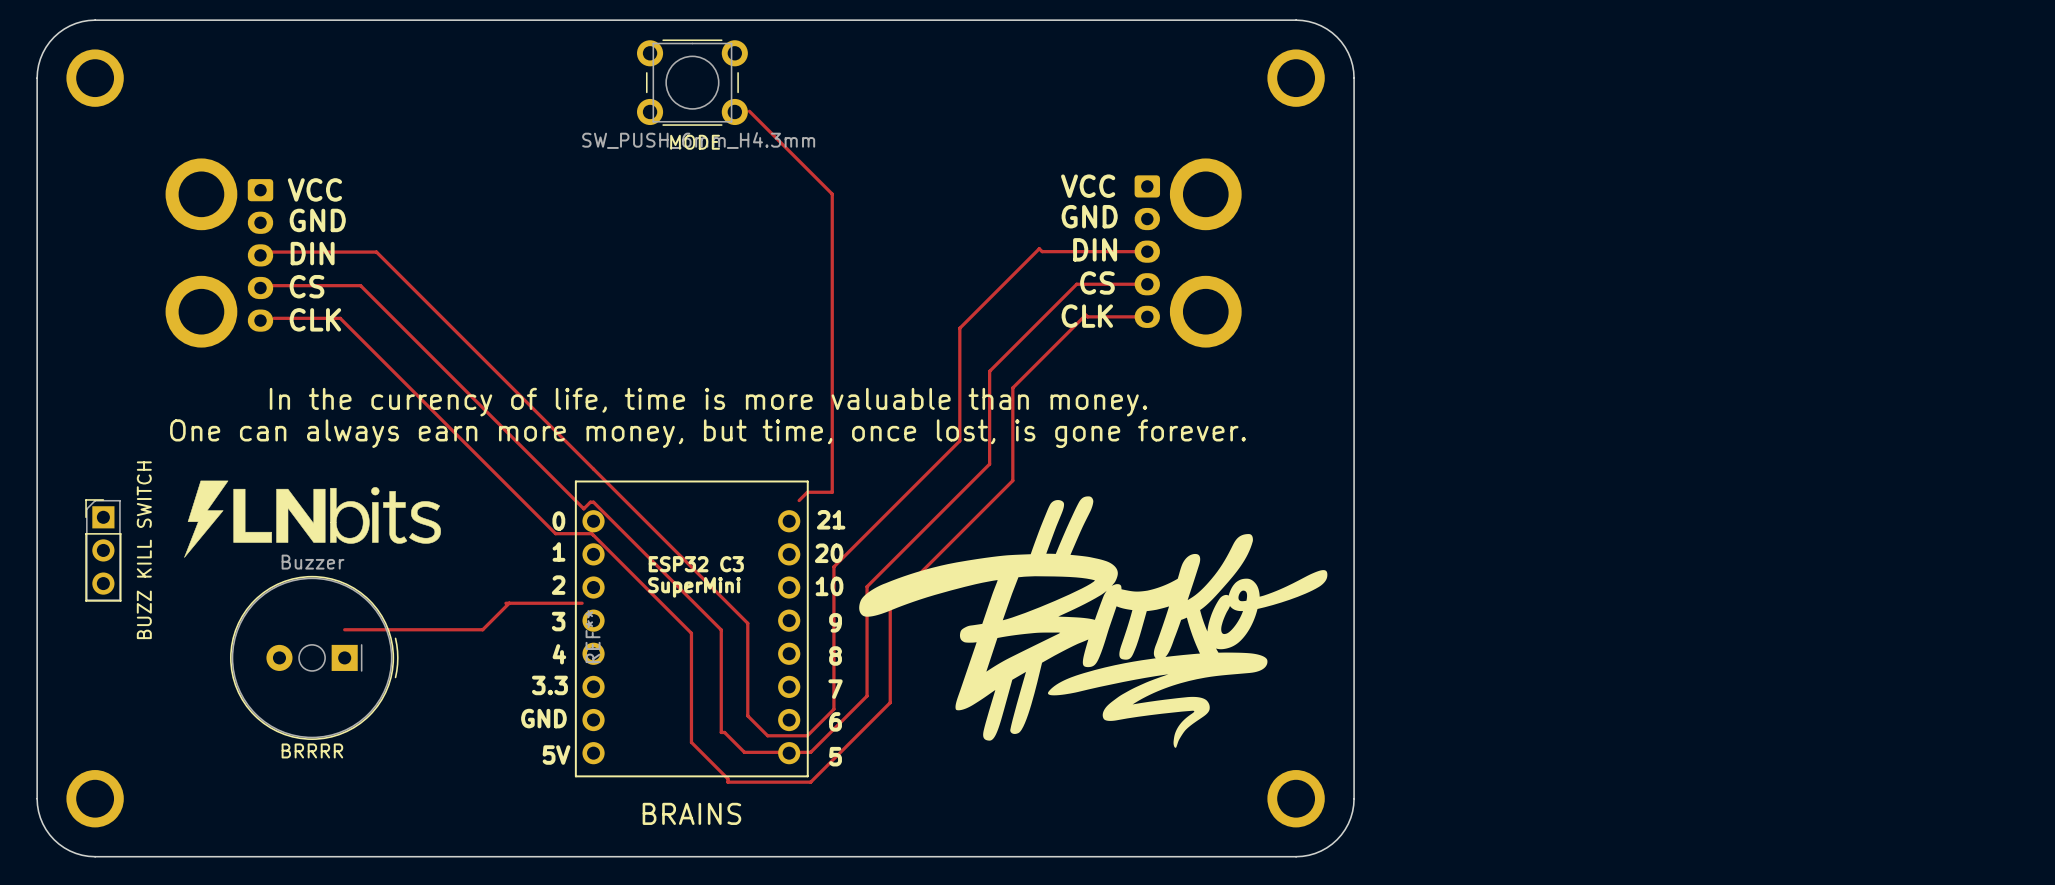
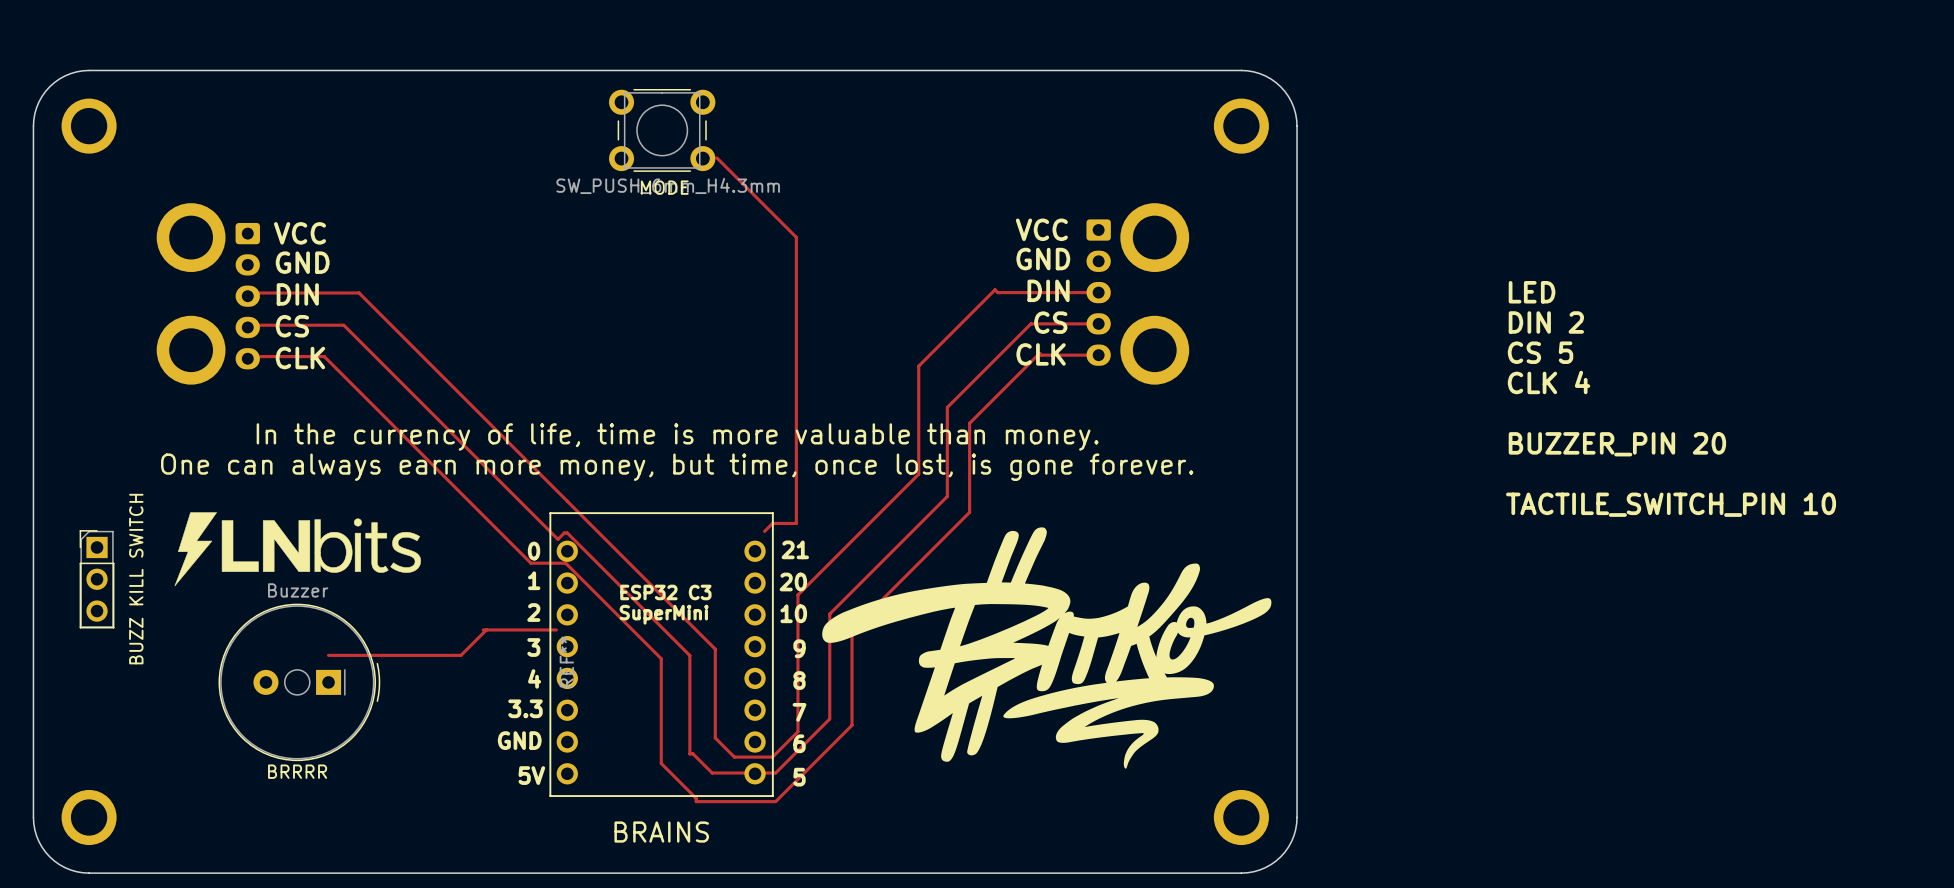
text: none -> LED (1532, 292)
text: none -> DIN 2 (1546, 322)
text: none -> CS 5 (1540, 352)
text: none -> CLK 4 (1549, 382)
text: none -> BUZZER_PIN 20 (1617, 444)
text: none -> TACTILE_SWITCH_PIN 10 (1671, 504)

